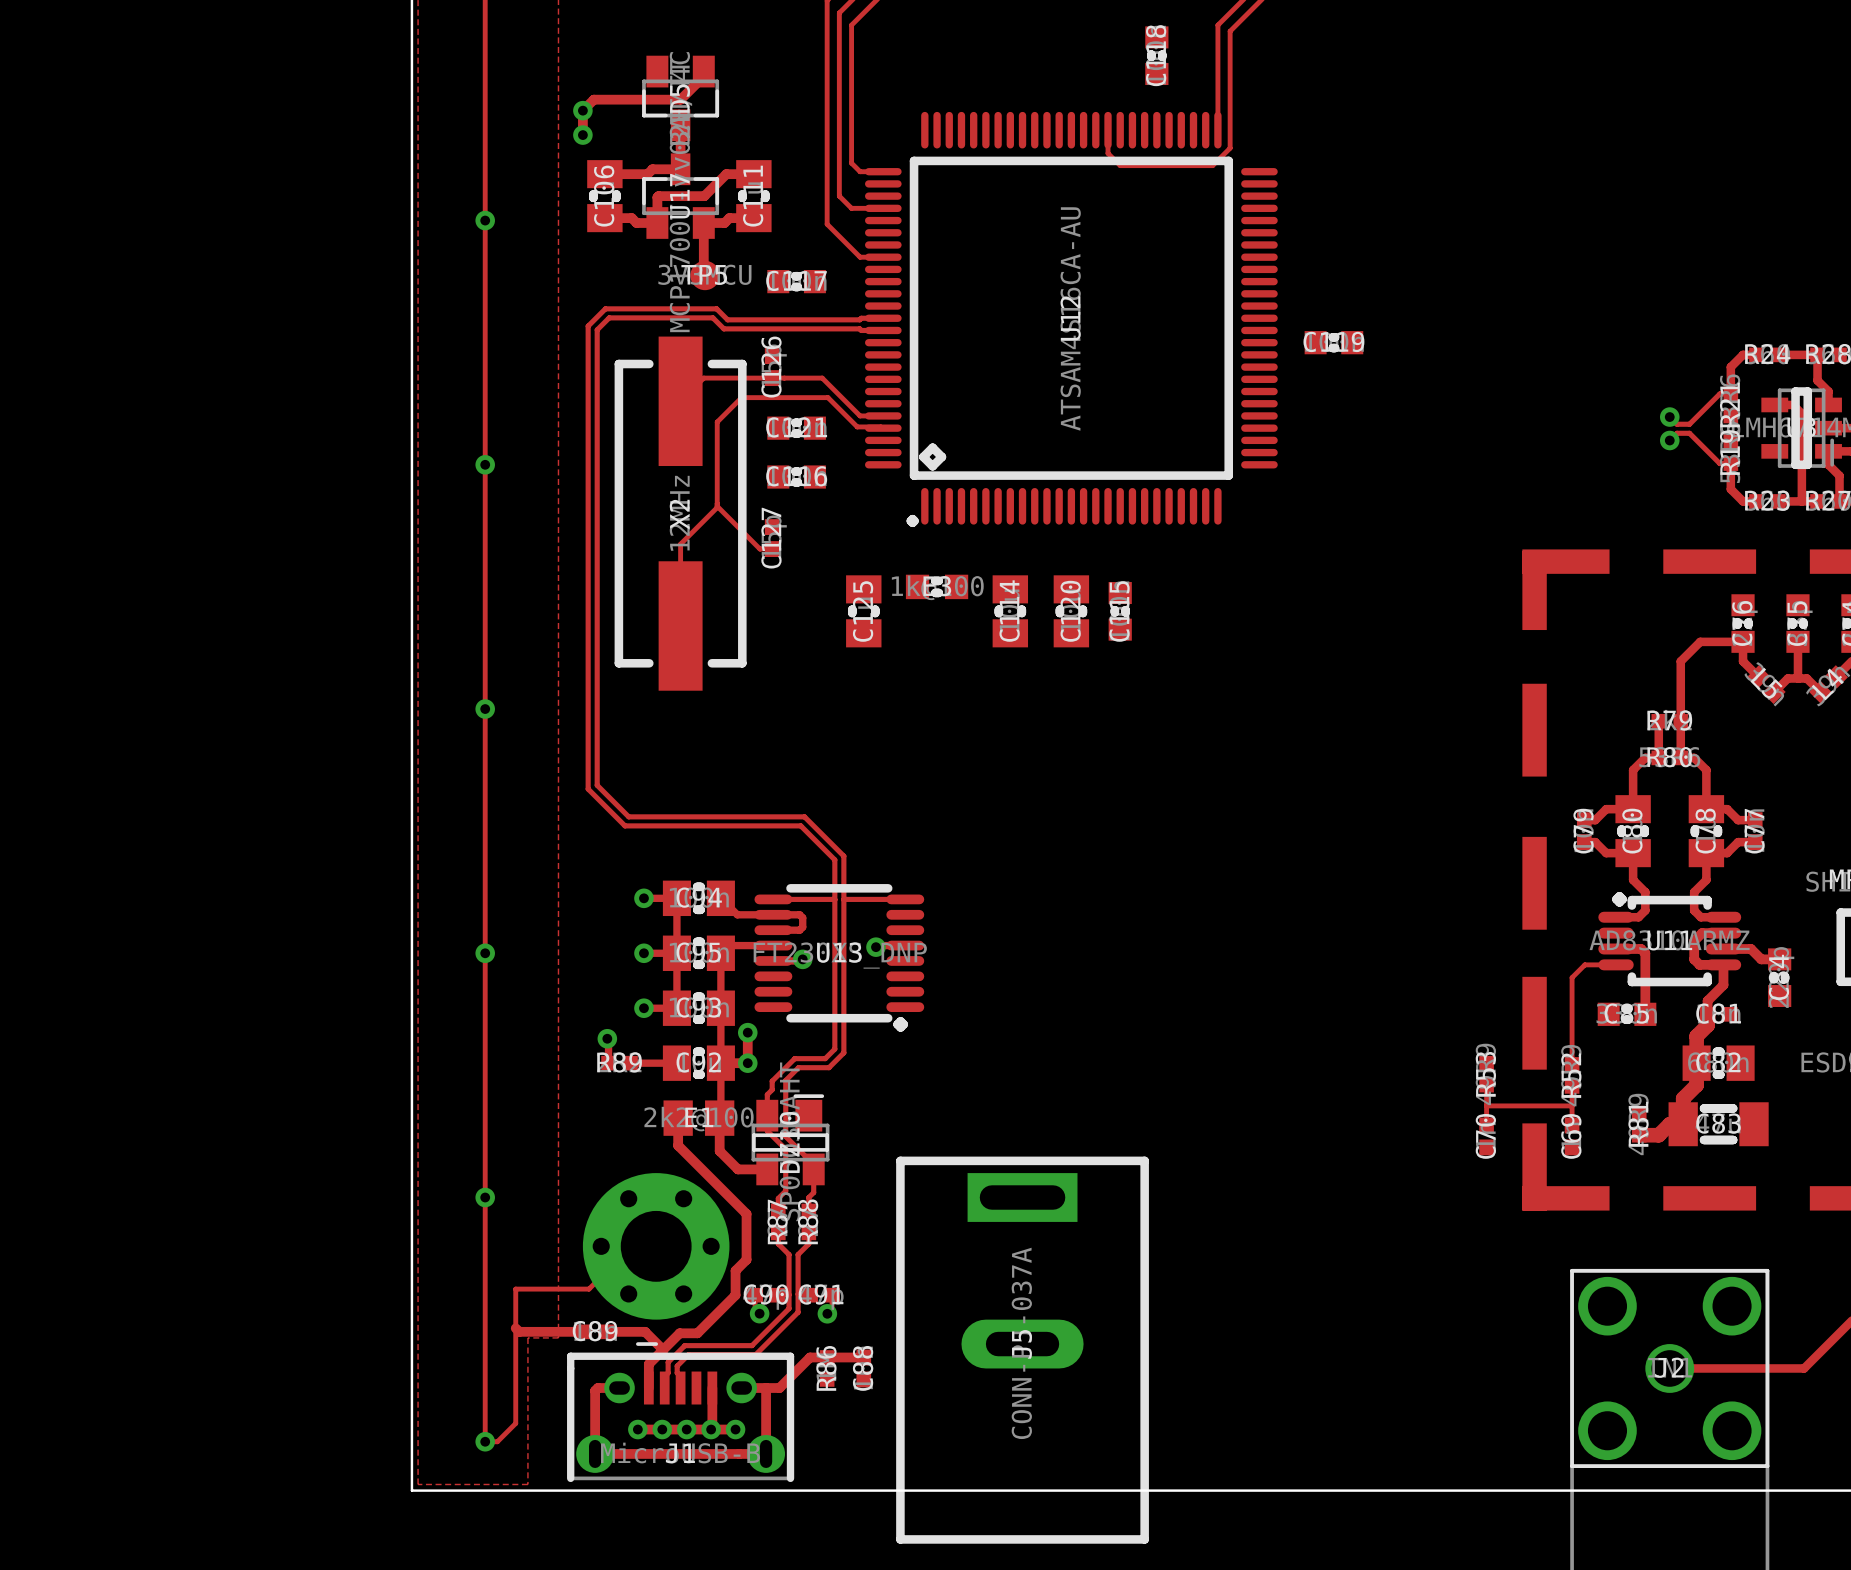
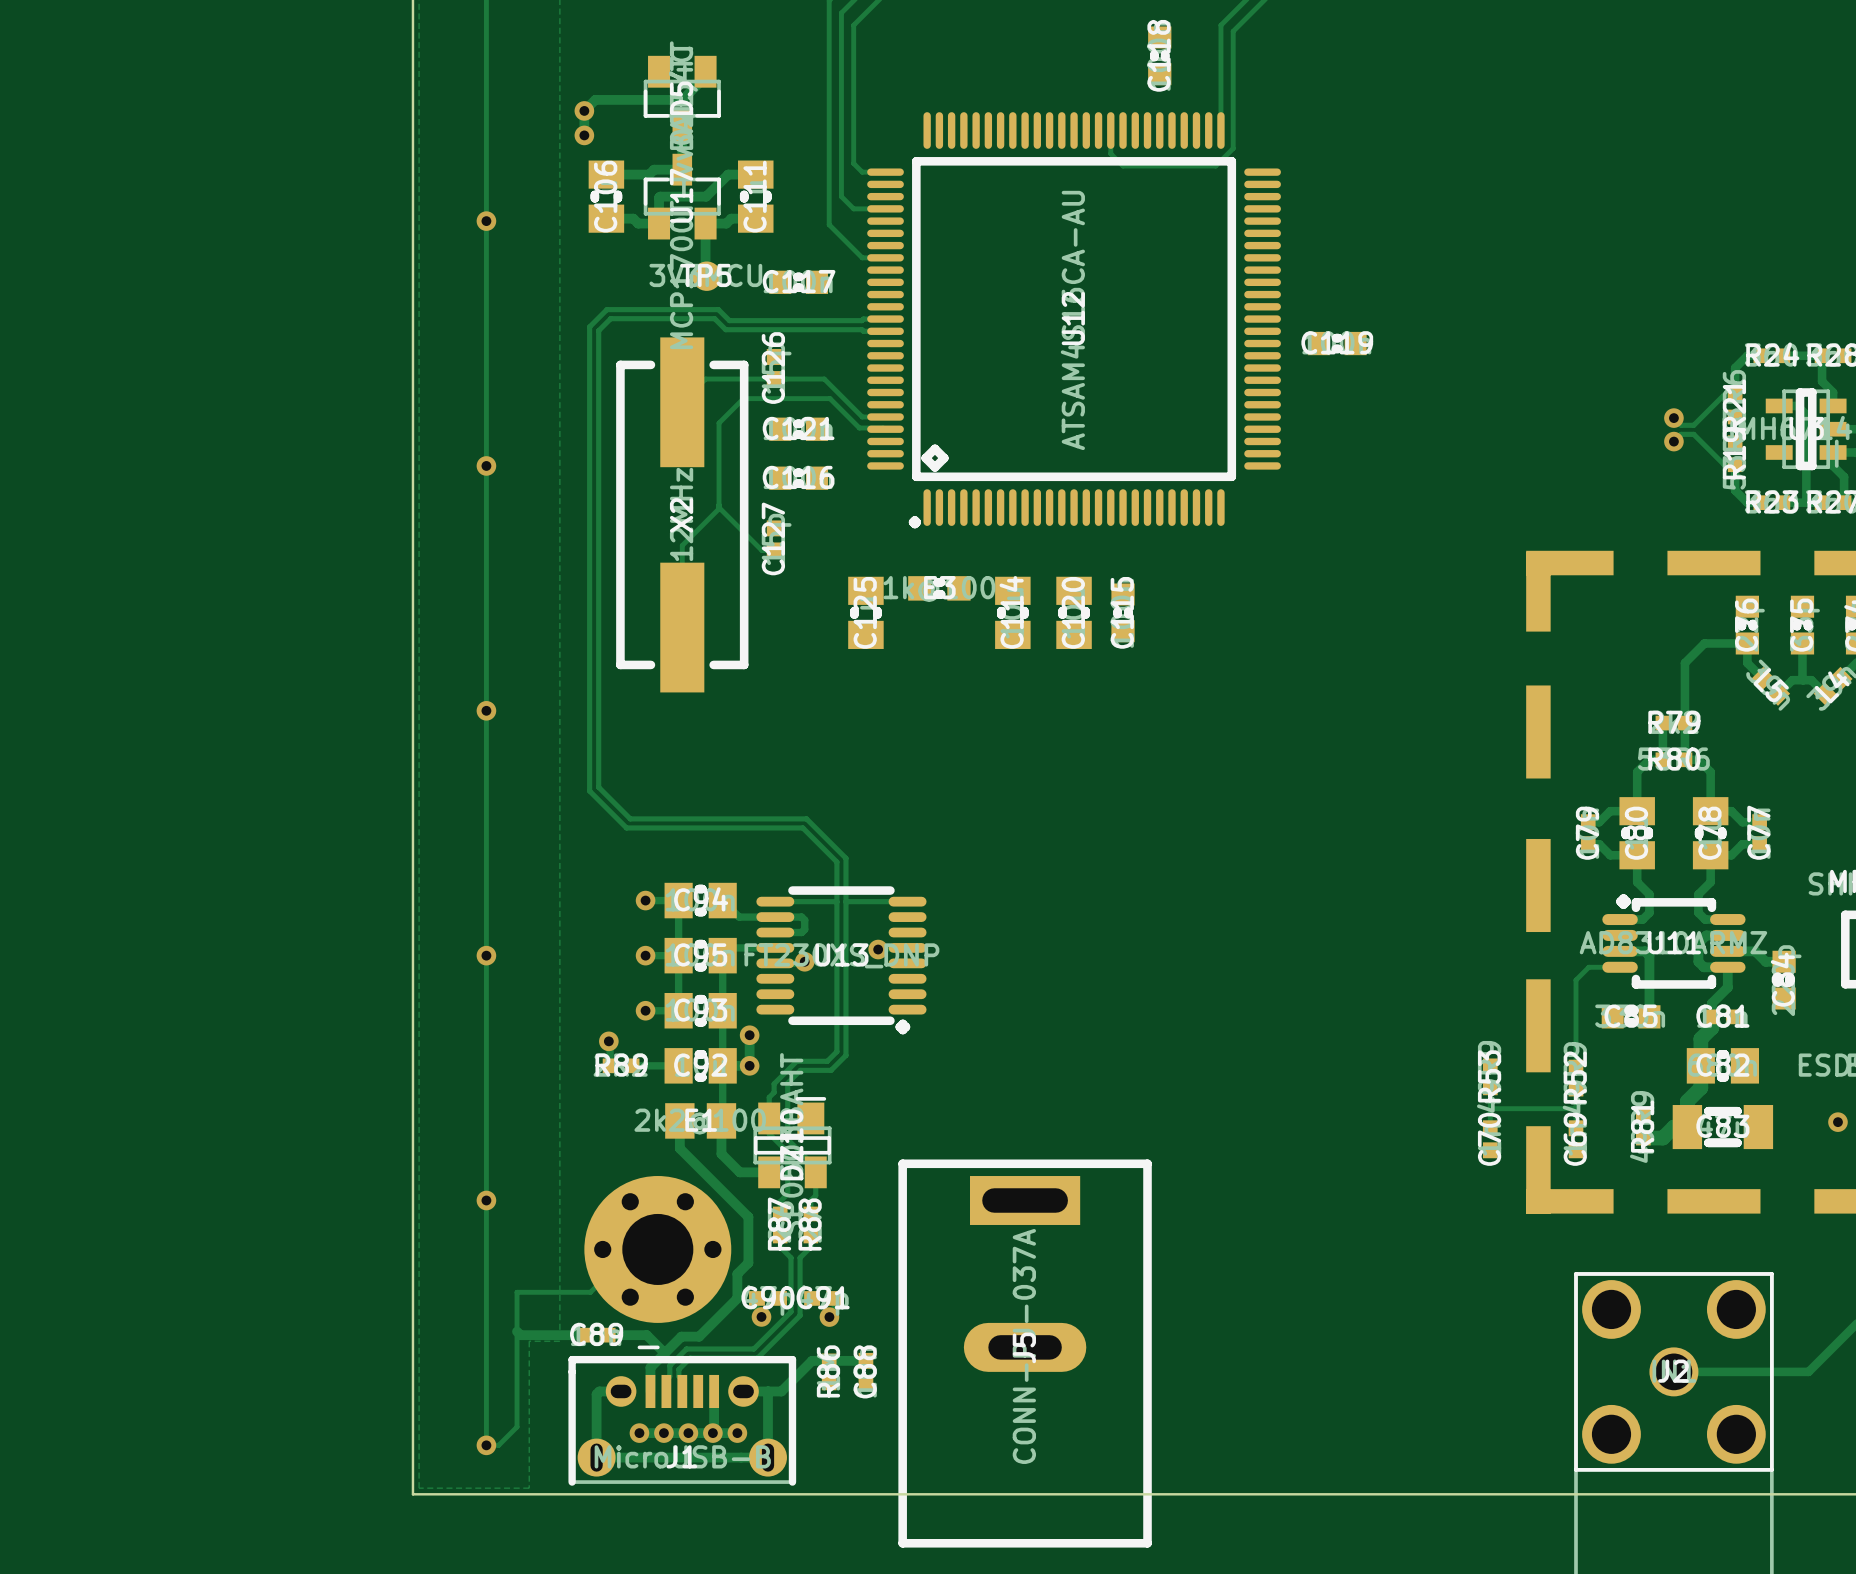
via: none -> (1837, 1122)

